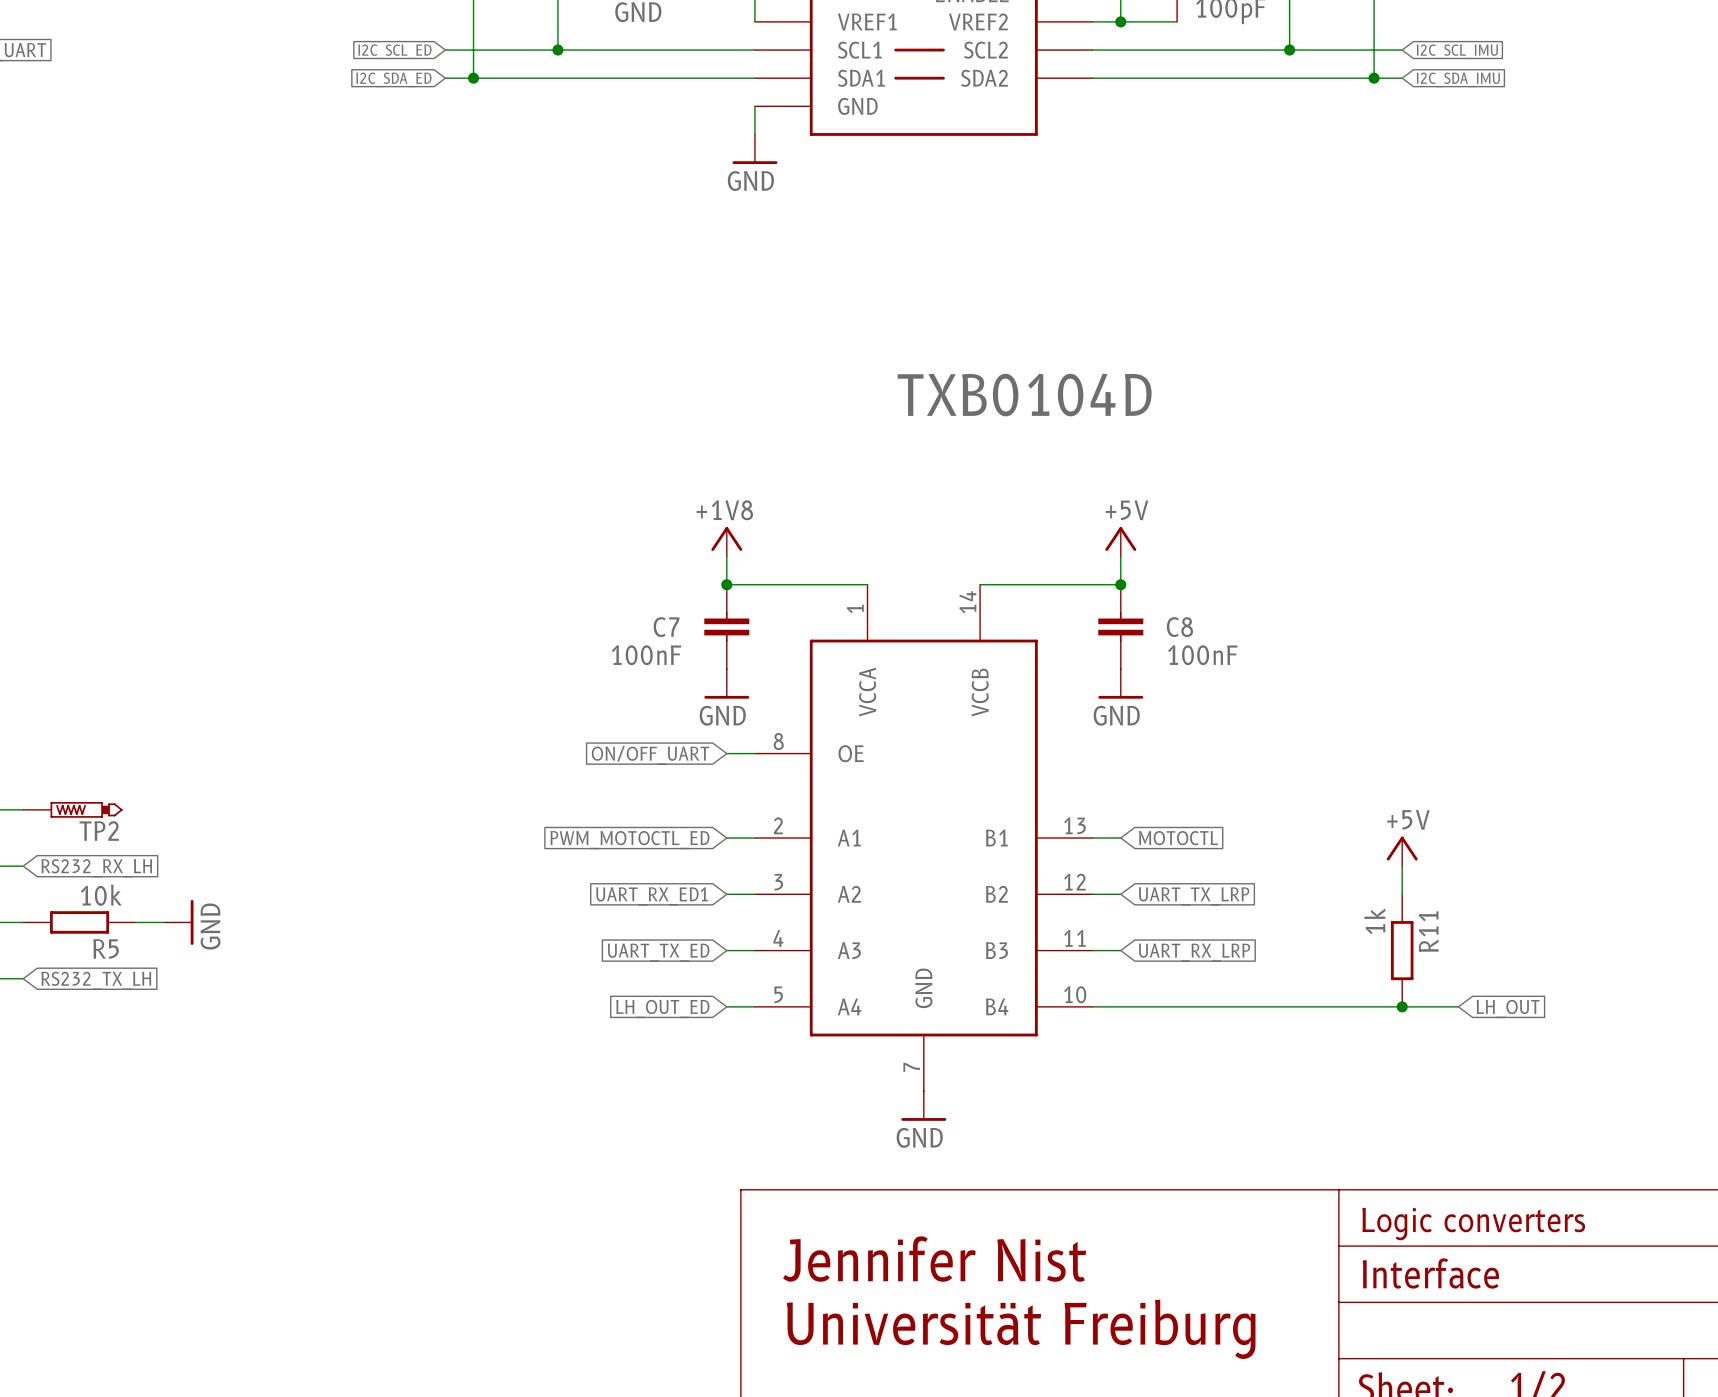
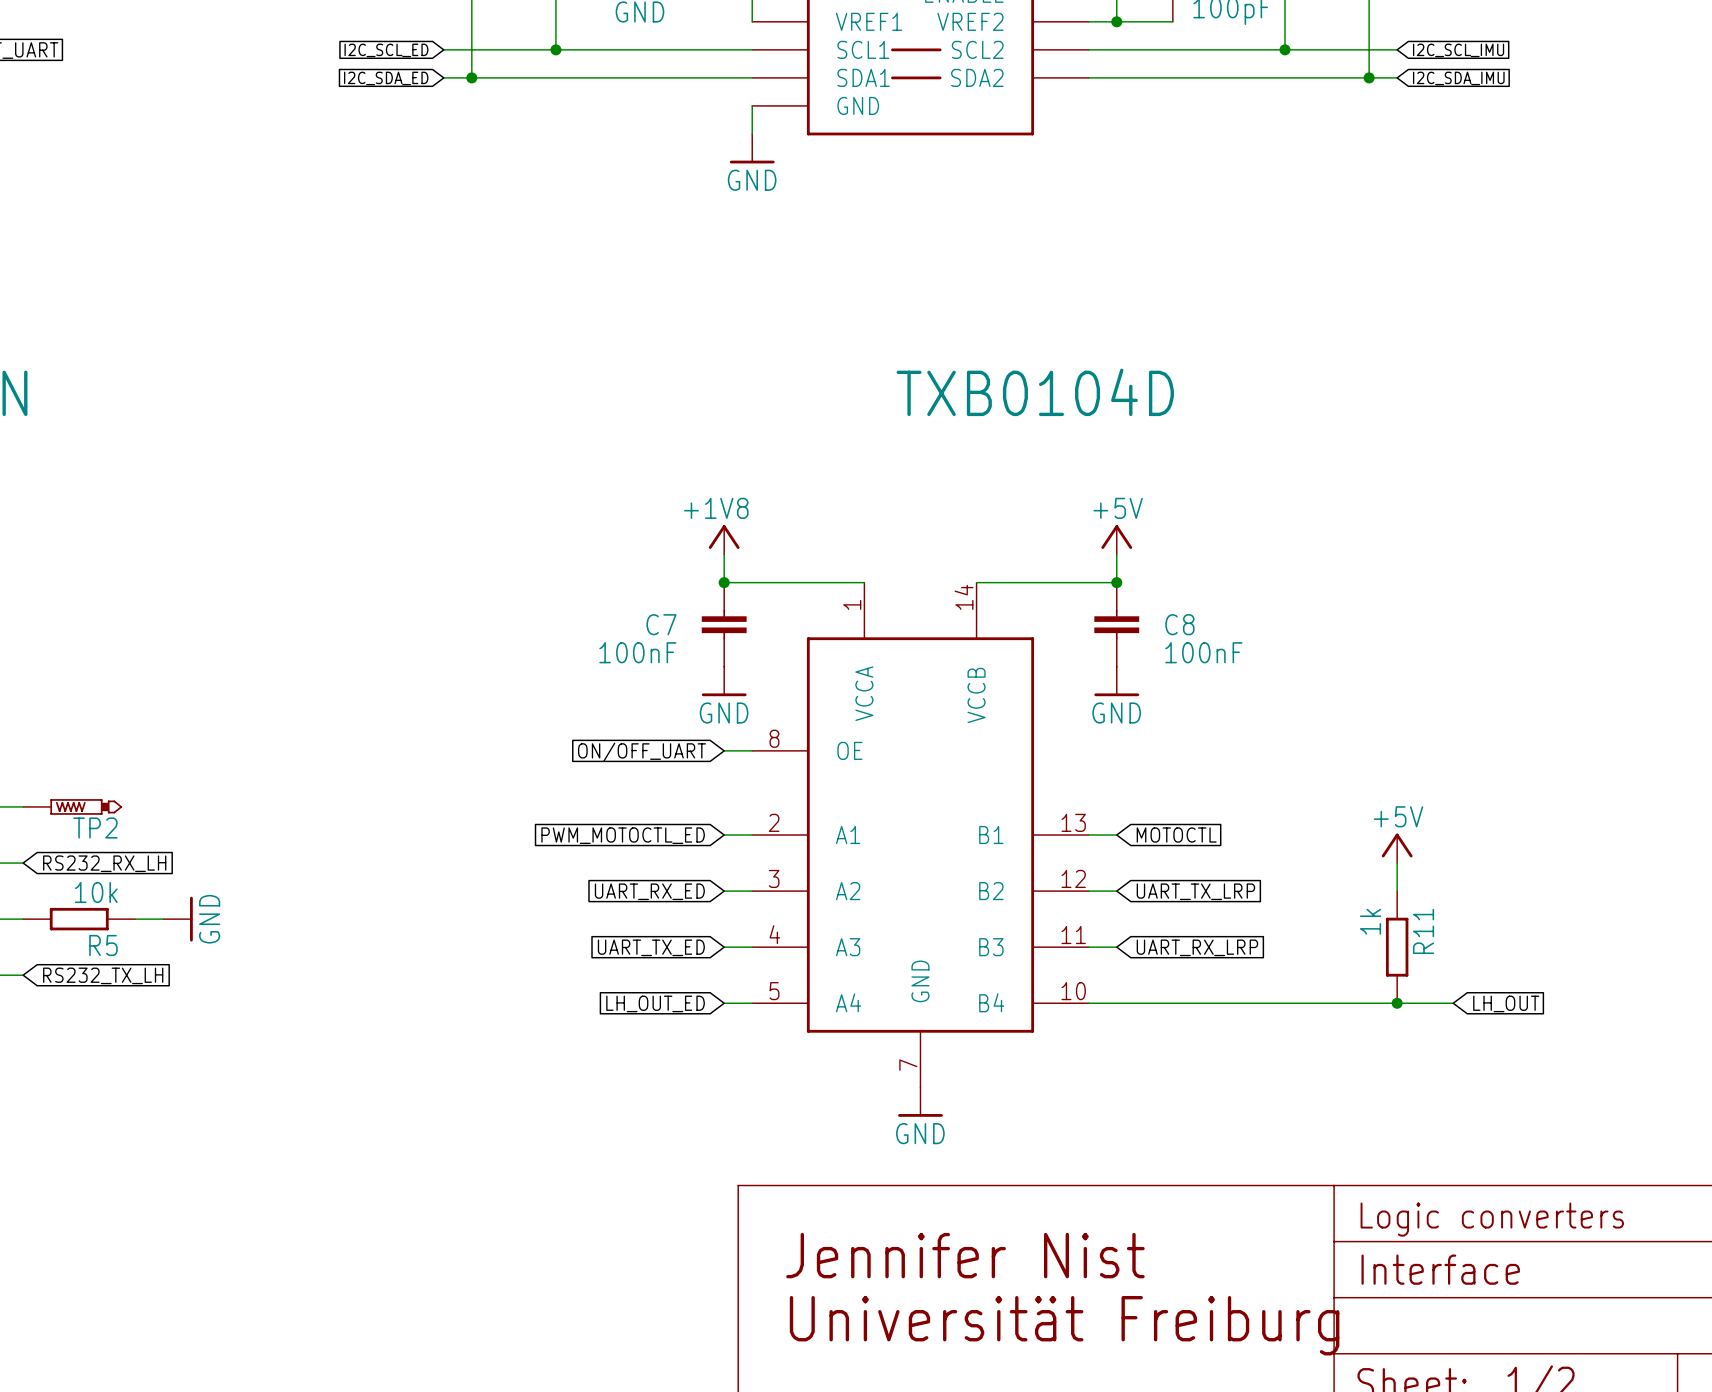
global label: UART_RX_ED1 (652, 896) -> UART_RX_ED (649, 891)

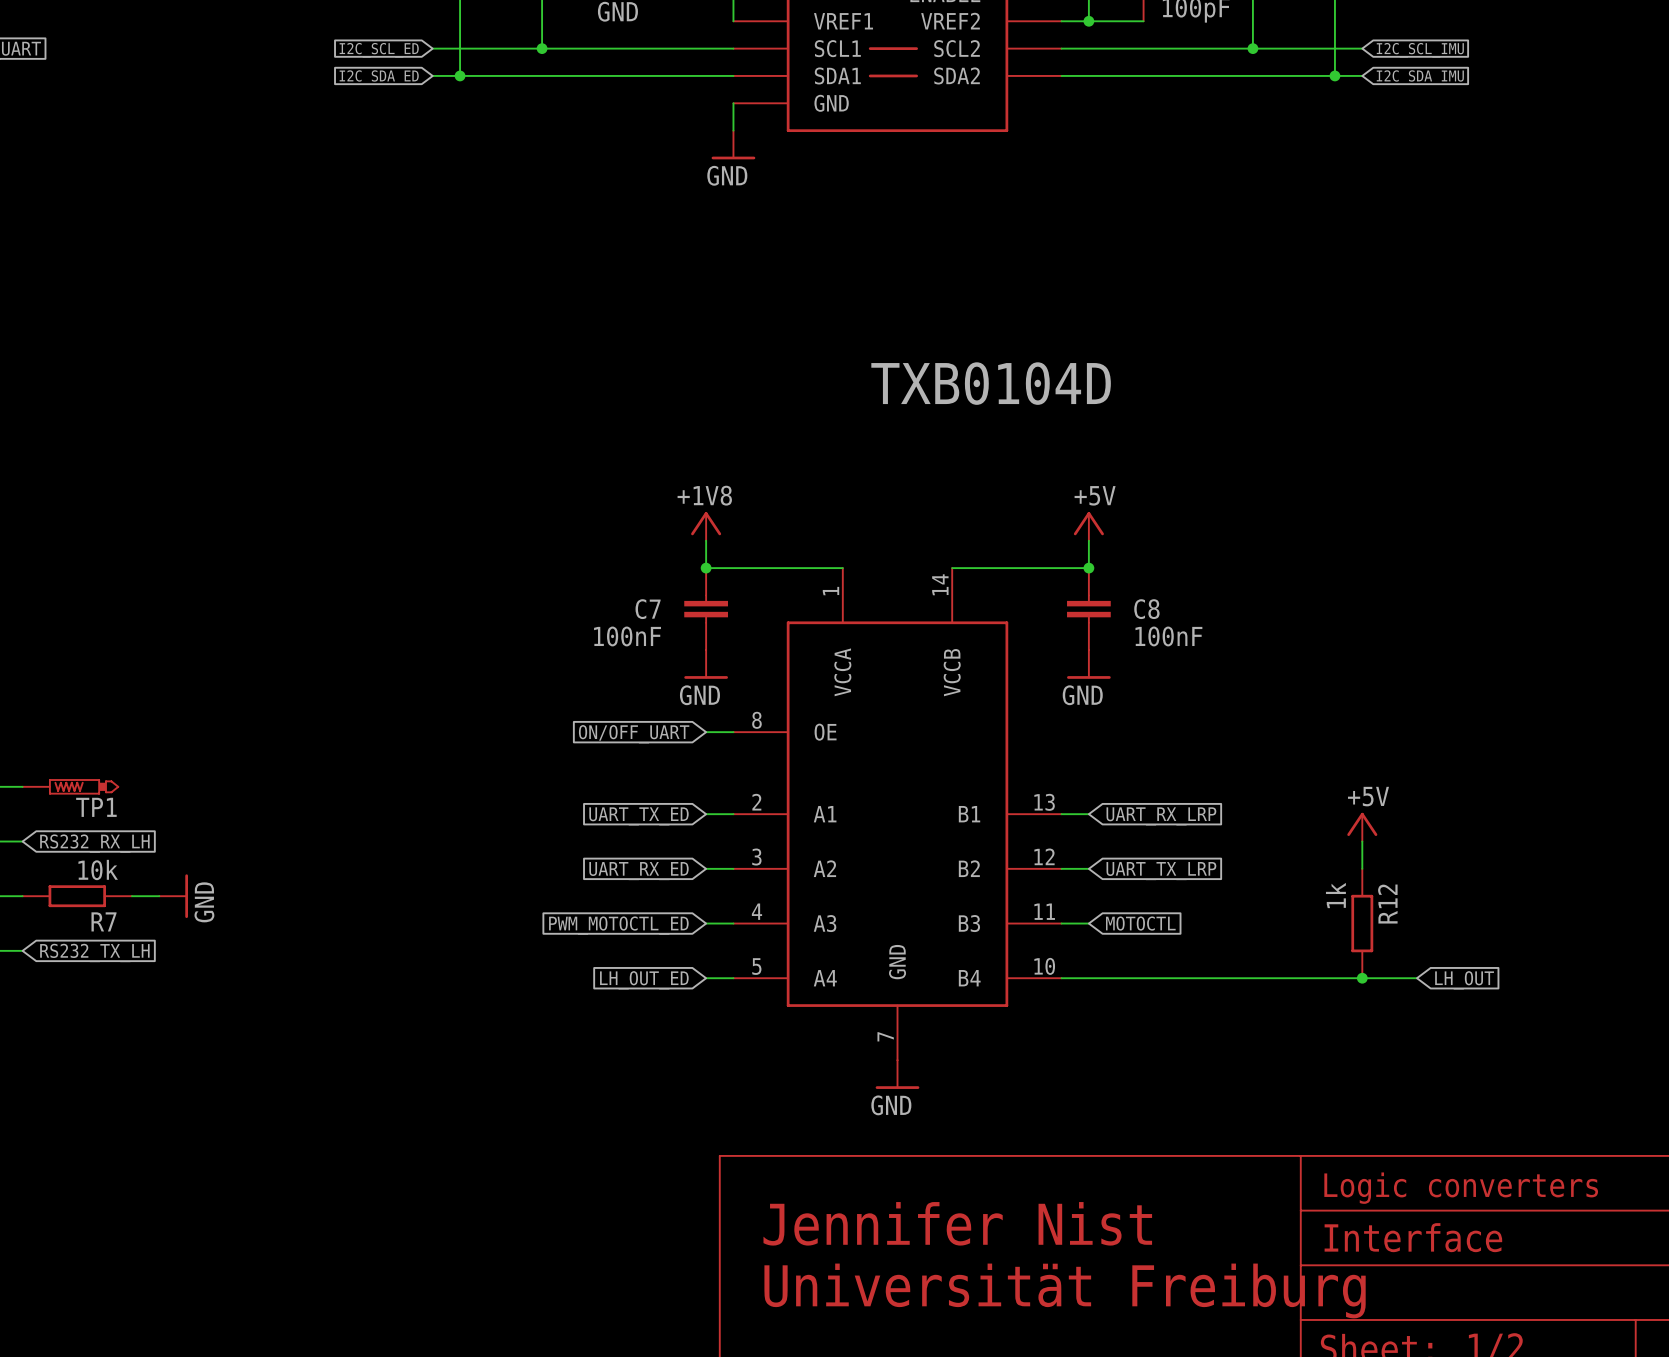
TP2 name: TP2 (95, 828) -> TP1 (96, 807)
global label: PWM_MOTOCTL_ED (623, 835) -> UART_TX_ED (638, 816)
global label: MOTOCTL (1176, 835) -> UART_RX_LRP (1161, 816)
R11 name: R11 (1423, 931) -> R12 (1387, 904)
R5 name: R5 (103, 945) -> R7 (103, 921)
global label: UART_TX_ED (651, 947) -> PWM_MOTOCTL_ED (618, 925)
global label: UART_RX_LRP (1197, 947) -> MOTOCTL (1140, 923)

